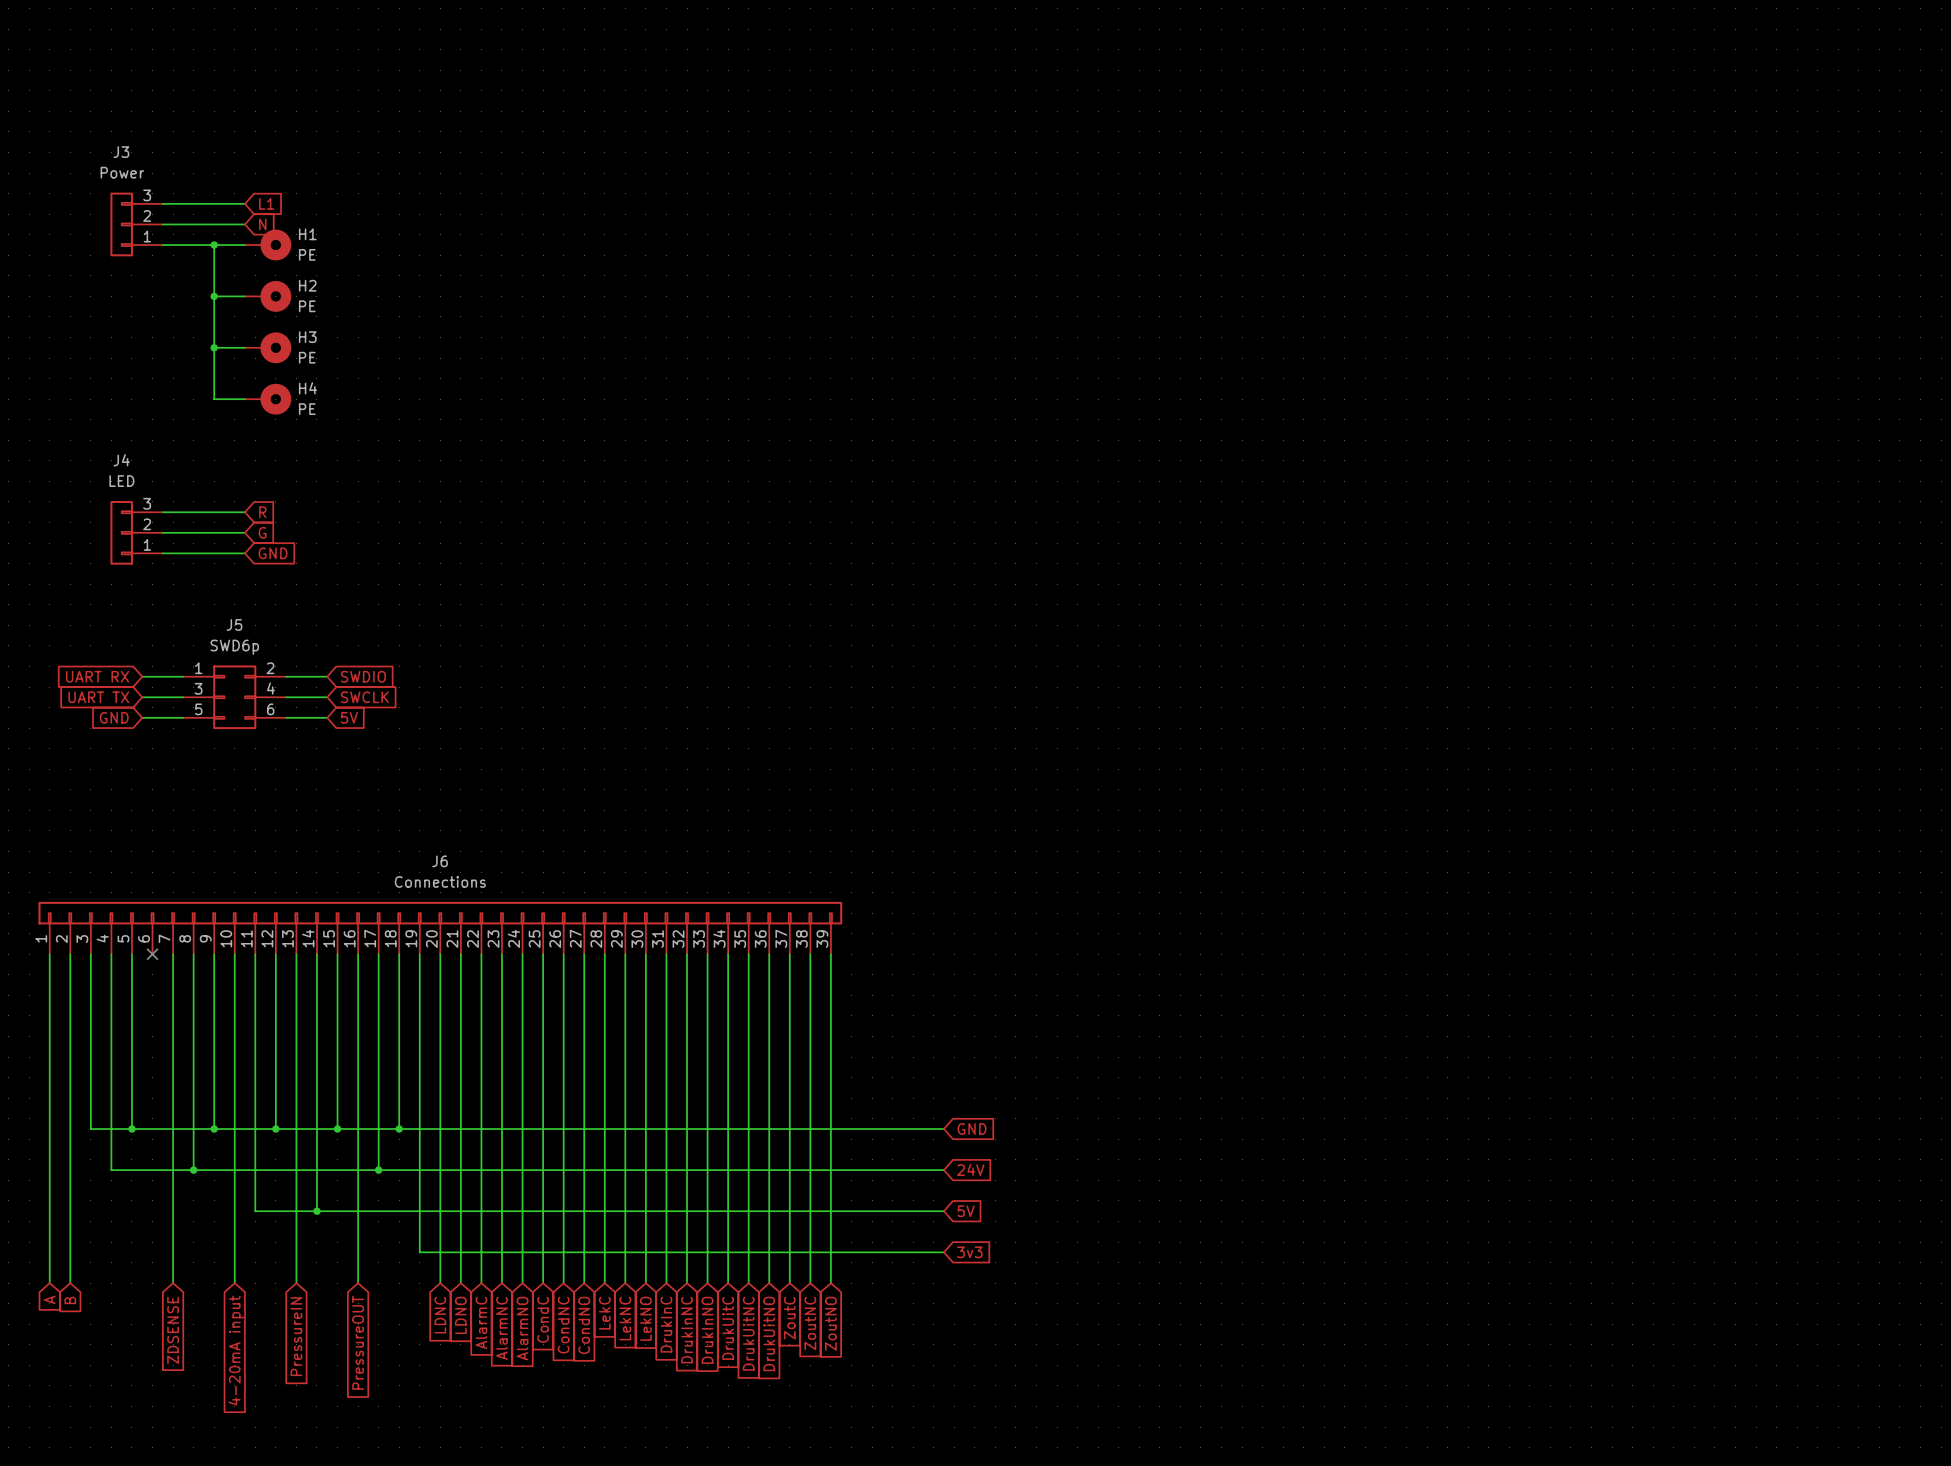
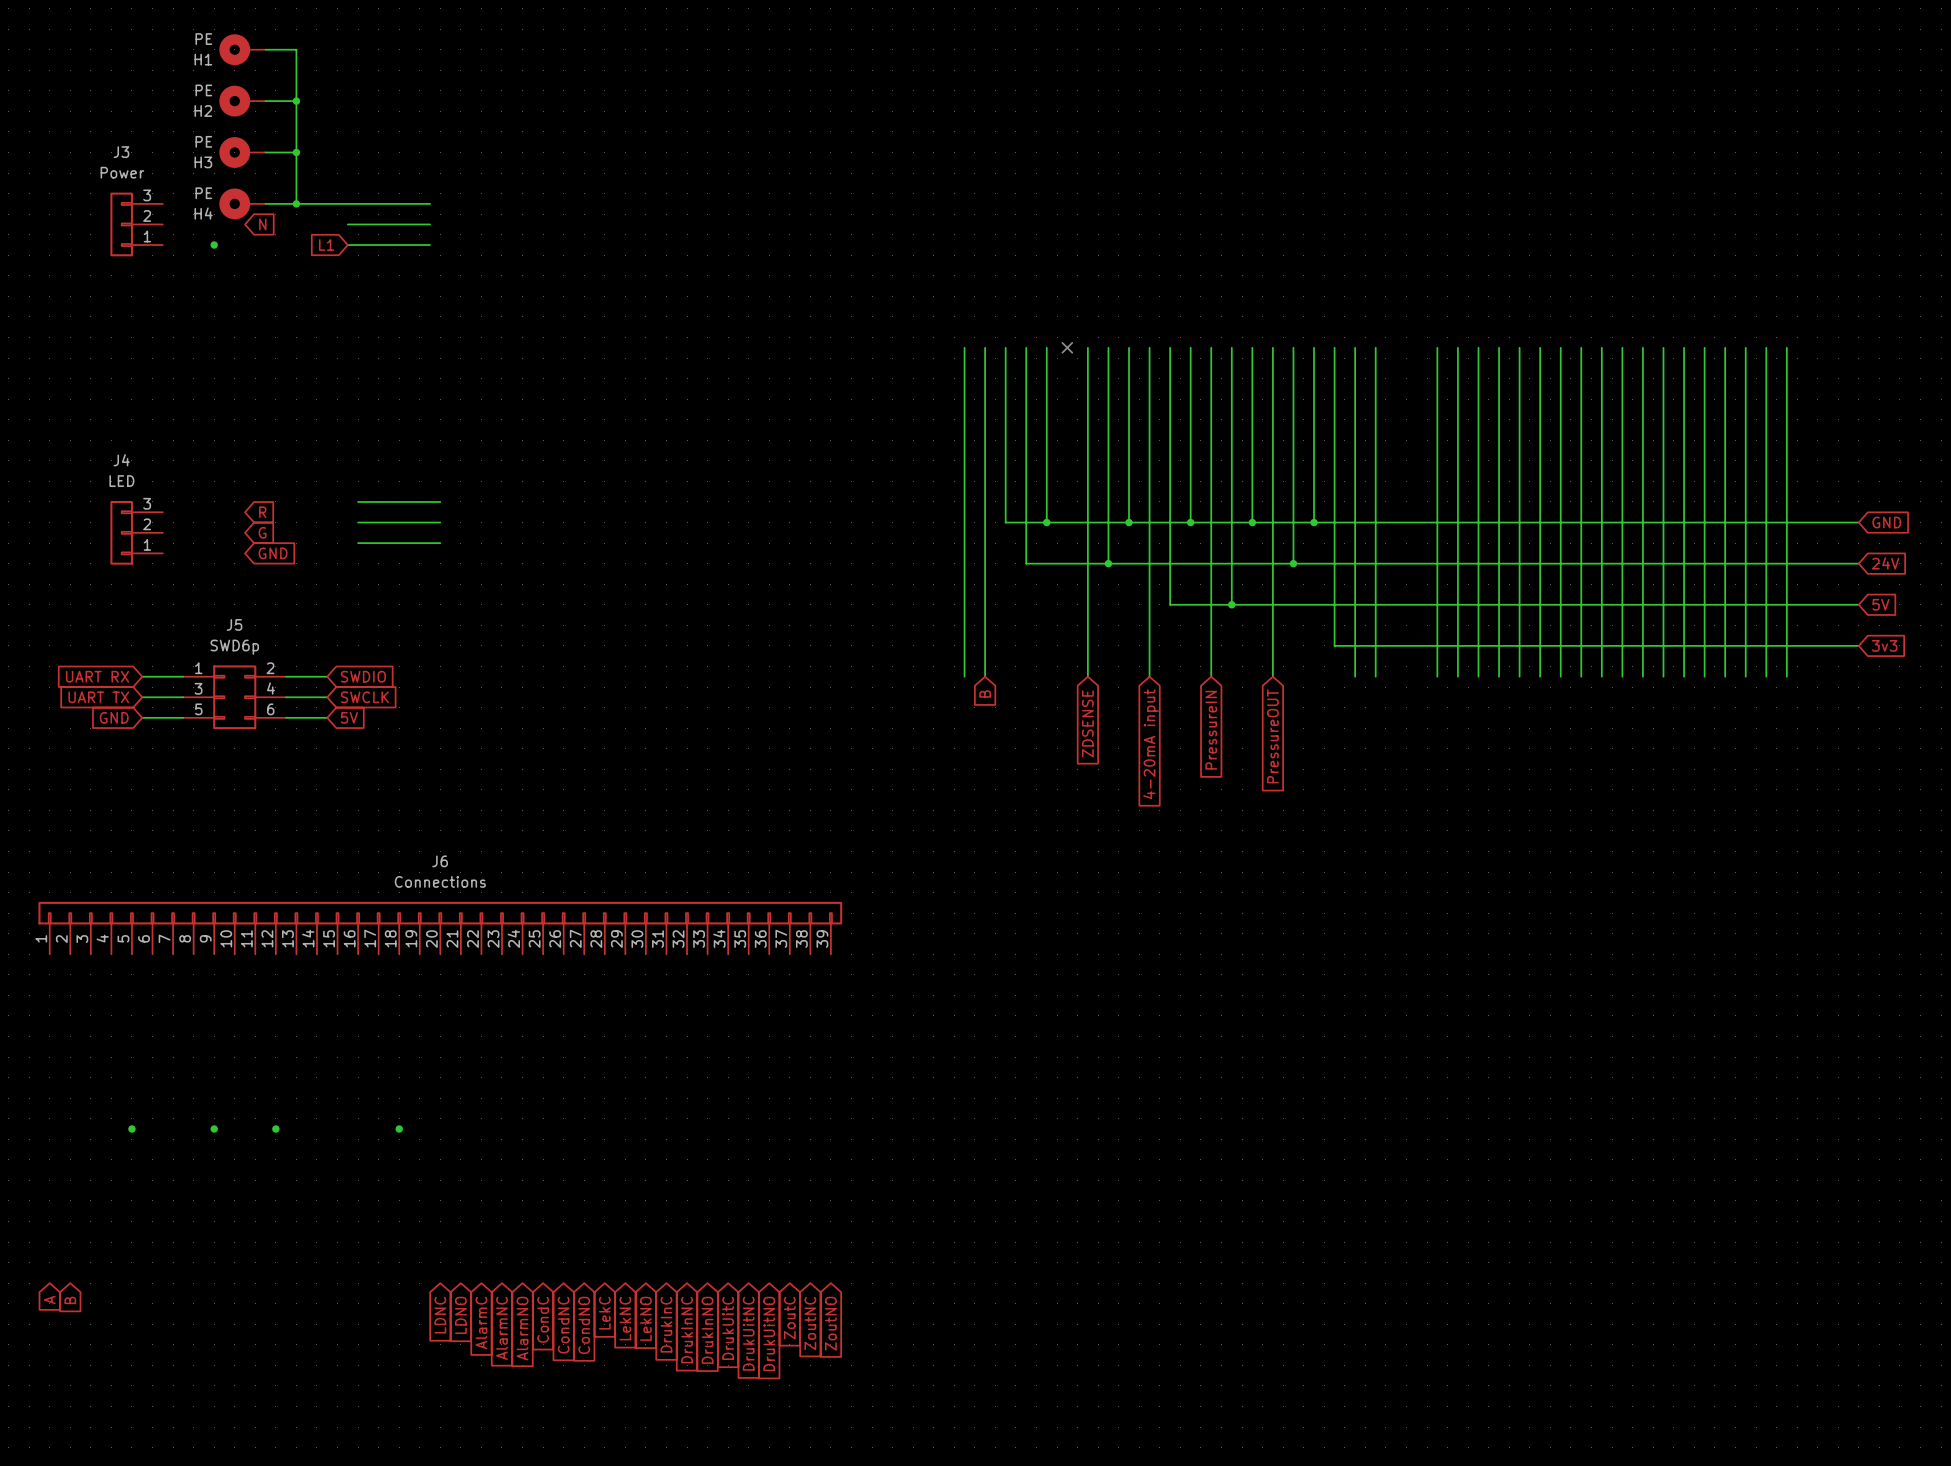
wire: none -> (265, 49) (296, 49) (296, 203)
junction: none -> (296, 101)
junction: none -> (296, 152)
wire: (162, 203) (245, 203) -> none
wire: none -> (265, 203) (430, 203)
global label rotation: 0° (266, 203) -> 180° (326, 245)
global label position: L1 (266, 203) -> L1 (326, 245)
junction: none -> (296, 203)
wire: (162, 224) (245, 224) -> (347, 224) (430, 224)
wire: (162, 245) (245, 245) -> (347, 245) (430, 245)
wire: (214, 245) (214, 399) (245, 399) -> none
H1 position: (268, 245) -> (242, 49)
H1 rotation: 0° (275, 245) -> 180° (234, 49)
wire: (214, 296) (245, 296) -> (265, 101) (296, 101)
junction: (214, 296) -> none
H2 position: (268, 296) -> (242, 101)
H2 rotation: 0° (275, 296) -> 180° (234, 101)
wire: (214, 347) (245, 347) -> (265, 152) (296, 152)
junction: (214, 347) -> none
H3 position: (268, 347) -> (242, 152)
H3 rotation: 0° (275, 347) -> 180° (234, 152)
wire: none -> (964, 347) (964, 676)
wire: none -> (985, 347) (985, 676)
wire: none -> (1005, 347) (1005, 522) (1858, 522)
wire: none -> (1026, 347) (1026, 563) (1858, 563)
wire: none -> (1046, 347) (1046, 522)
no-connect mark: none -> (1067, 347)
wire: none -> (1087, 347) (1087, 676)
wire: none -> (1108, 347) (1108, 563)
wire: none -> (1129, 347) (1129, 522)
wire: none -> (1149, 347) (1149, 676)
wire: none -> (1170, 347) (1170, 604) (1858, 604)
wire: none -> (1190, 347) (1190, 522)
wire: none -> (1211, 347) (1211, 676)
wire: none -> (1231, 347) (1231, 604)
wire: none -> (1252, 347) (1252, 522)
wire: none -> (1272, 347) (1272, 676)
wire: none -> (1293, 347) (1293, 563)
wire: none -> (1314, 347) (1314, 522)
wire: none -> (1334, 347) (1334, 645) (1858, 645)
wire: none -> (1355, 347) (1355, 676)
wire: none -> (1375, 347) (1375, 676)
wire: none -> (1437, 347) (1437, 676)
wire: none -> (1457, 347) (1457, 676)
wire: none -> (1478, 347) (1478, 676)
wire: none -> (1499, 347) (1499, 676)
wire: none -> (1519, 347) (1519, 676)
wire: none -> (1540, 347) (1540, 676)
wire: none -> (1560, 347) (1560, 676)
wire: none -> (1581, 347) (1581, 676)
wire: none -> (1601, 347) (1601, 676)
wire: none -> (1622, 347) (1622, 676)
wire: none -> (1642, 347) (1642, 676)
wire: none -> (1663, 347) (1663, 676)
wire: none -> (1684, 347) (1684, 676)
wire: none -> (1704, 347) (1704, 676)
wire: none -> (1725, 347) (1725, 676)
wire: none -> (1745, 347) (1745, 676)
wire: none -> (1766, 347) (1766, 676)
wire: none -> (1786, 347) (1786, 676)
H4 position: (268, 399) -> (242, 203)
H4 rotation: 0° (275, 399) -> 180° (234, 203)
wire: (162, 512) (245, 512) -> (358, 501) (440, 501)
junction: none -> (1046, 522)
junction: none -> (1129, 522)
junction: none -> (1190, 522)
junction: none -> (1252, 522)
junction: none -> (1314, 522)
global label: none -> GND (1886, 522)
wire: (162, 532) (245, 532) -> (358, 522) (440, 522)
wire: (162, 553) (245, 553) -> (358, 543) (440, 543)
junction: none -> (1108, 563)
junction: none -> (1293, 563)
global label: none -> 24V (1885, 563)
junction: none -> (1231, 604)
global label: none -> 5V (1880, 604)
global label: none -> 3v3 (1884, 645)
global label: none -> B (985, 693)
global label: none -> ZDSENSE (1087, 723)
global label: none -> PressureIN (1211, 730)
global label: none -> PressureOUT (1272, 736)
global label: none -> 4-20mA input (1151, 744)
wire: (49, 954) (49, 1283) -> none
wire: (70, 954) (70, 1283) -> none
wire: (90, 954) (90, 1128) (943, 1128) -> none
wire: (111, 954) (111, 1170) (943, 1170) -> none
wire: (131, 954) (131, 1128) -> none
no-connect mark: (152, 954) -> none
wire: (173, 954) (173, 1283) -> none
wire: (193, 954) (193, 1170) -> none
wire: (214, 954) (214, 1128) -> none
wire: (234, 954) (234, 1283) -> none
wire: (255, 954) (255, 1211) (943, 1211) -> none
wire: (275, 954) (275, 1128) -> none
wire: (296, 954) (296, 1283) -> none
wire: (316, 954) (316, 1211) -> none
wire: (337, 954) (337, 1128) -> none
wire: (358, 954) (358, 1283) -> none
wire: (378, 954) (378, 1170) -> none
wire: (399, 954) (399, 1128) -> none
wire: (419, 954) (419, 1252) (943, 1252) -> none
wire: (440, 954) (440, 1283) -> none
wire: (460, 954) (460, 1283) -> none
wire: (481, 954) (481, 1283) -> none
wire: (501, 954) (501, 1283) -> none
wire: (522, 954) (522, 1283) -> none
wire: (543, 954) (543, 1283) -> none
wire: (563, 954) (563, 1283) -> none
wire: (584, 954) (584, 1283) -> none
wire: (604, 954) (604, 1283) -> none
wire: (625, 954) (625, 1283) -> none
wire: (645, 954) (645, 1283) -> none
wire: (666, 954) (666, 1283) -> none
wire: (687, 954) (687, 1283) -> none
wire: (707, 954) (707, 1283) -> none
wire: (728, 954) (728, 1283) -> none
wire: (748, 954) (748, 1283) -> none
wire: (769, 954) (769, 1283) -> none
wire: (789, 954) (789, 1283) -> none
wire: (810, 954) (810, 1283) -> none
wire: (830, 954) (830, 1283) -> none
junction: (337, 1128) -> none
global label: GND (972, 1128) -> none
global label: 24V (970, 1169) -> none
junction: (193, 1170) -> none
junction: (378, 1170) -> none
junction: (316, 1211) -> none
global label: 5V (966, 1211) -> none
global label: 3v3 (969, 1252) -> none
global label: ZDSENSE (173, 1330) -> none
global label: PressureIN (296, 1336) -> none
global label: PressureOUT (358, 1342) -> none
global label: 4-20mA input (236, 1350) -> none

